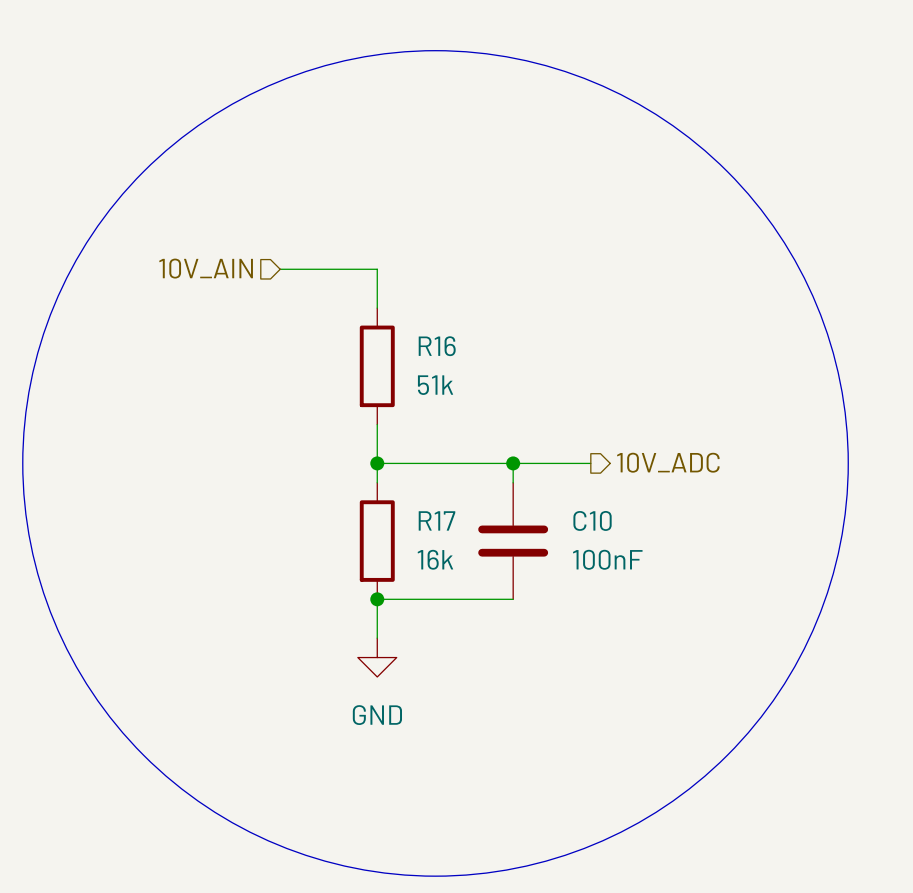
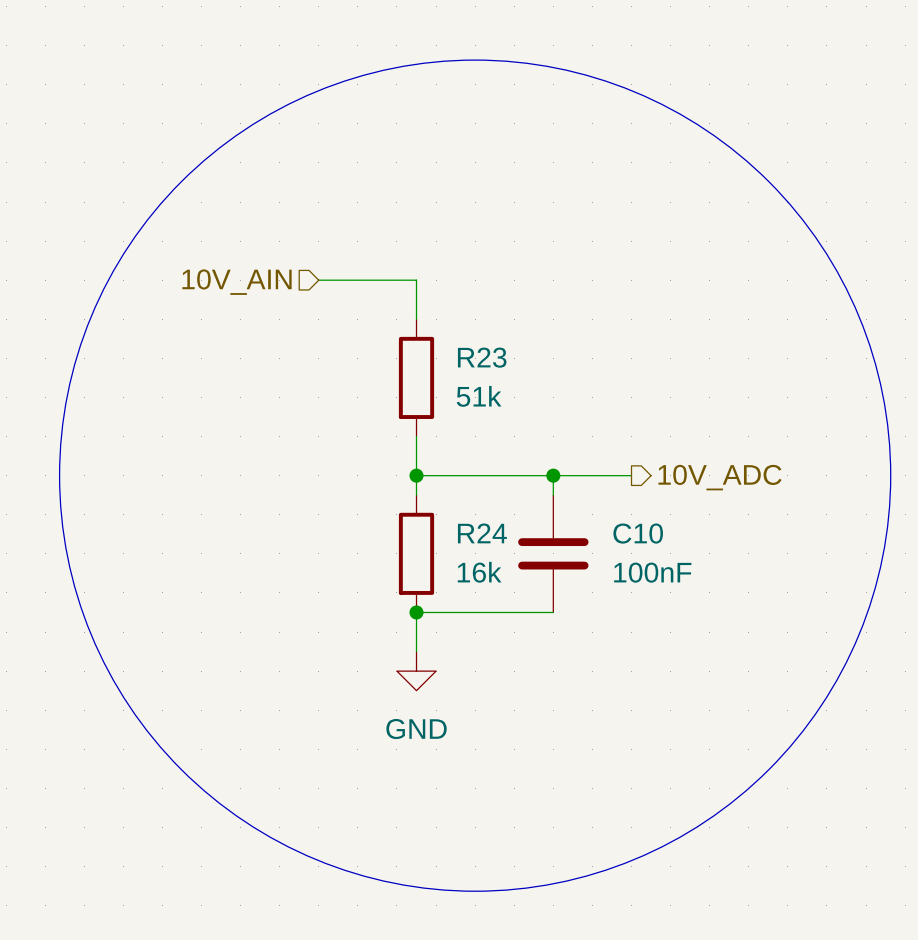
R16 name: R16 (437, 346) -> R23 (482, 357)
R17 name: R17 (437, 520) -> R24 (482, 533)

